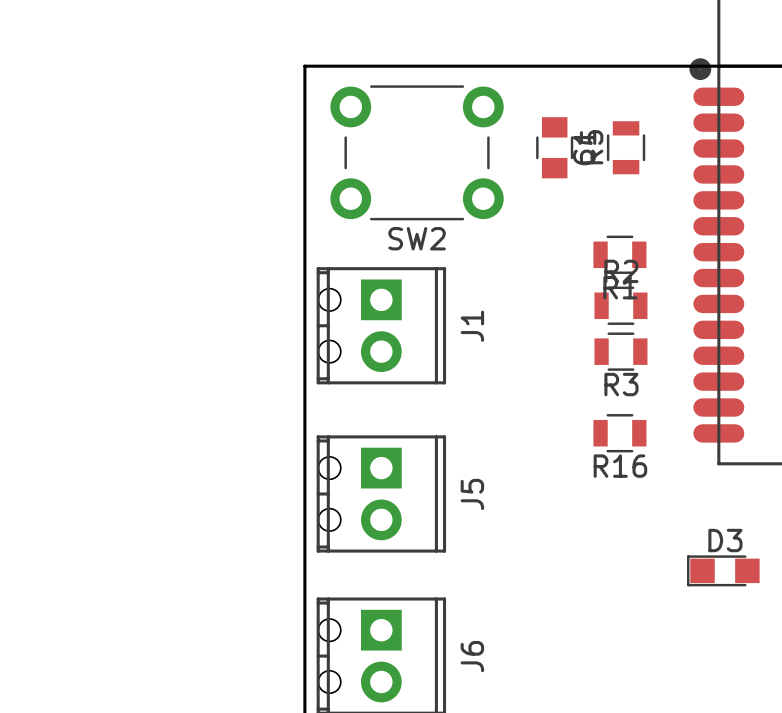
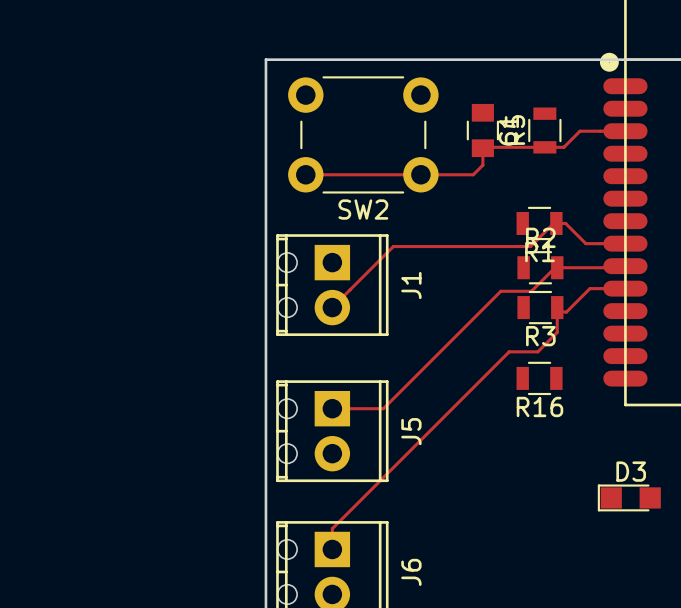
track: none -> (625, 131) (579, 131) (563, 147) (483, 147) (482, 165) (473, 174) (305, 174)
track: none -> (625, 243) (585, 243) (565, 223) (553, 223) (530, 246) (393, 246) (332, 307)
track: none -> (625, 266) (623, 267) (555, 267) (531, 291) (500, 291) (383, 408) (332, 408)
track: none -> (625, 288) (589, 288) (566, 312) (557, 312) (557, 332) (537, 351) (509, 351) (332, 528) (332, 549)

